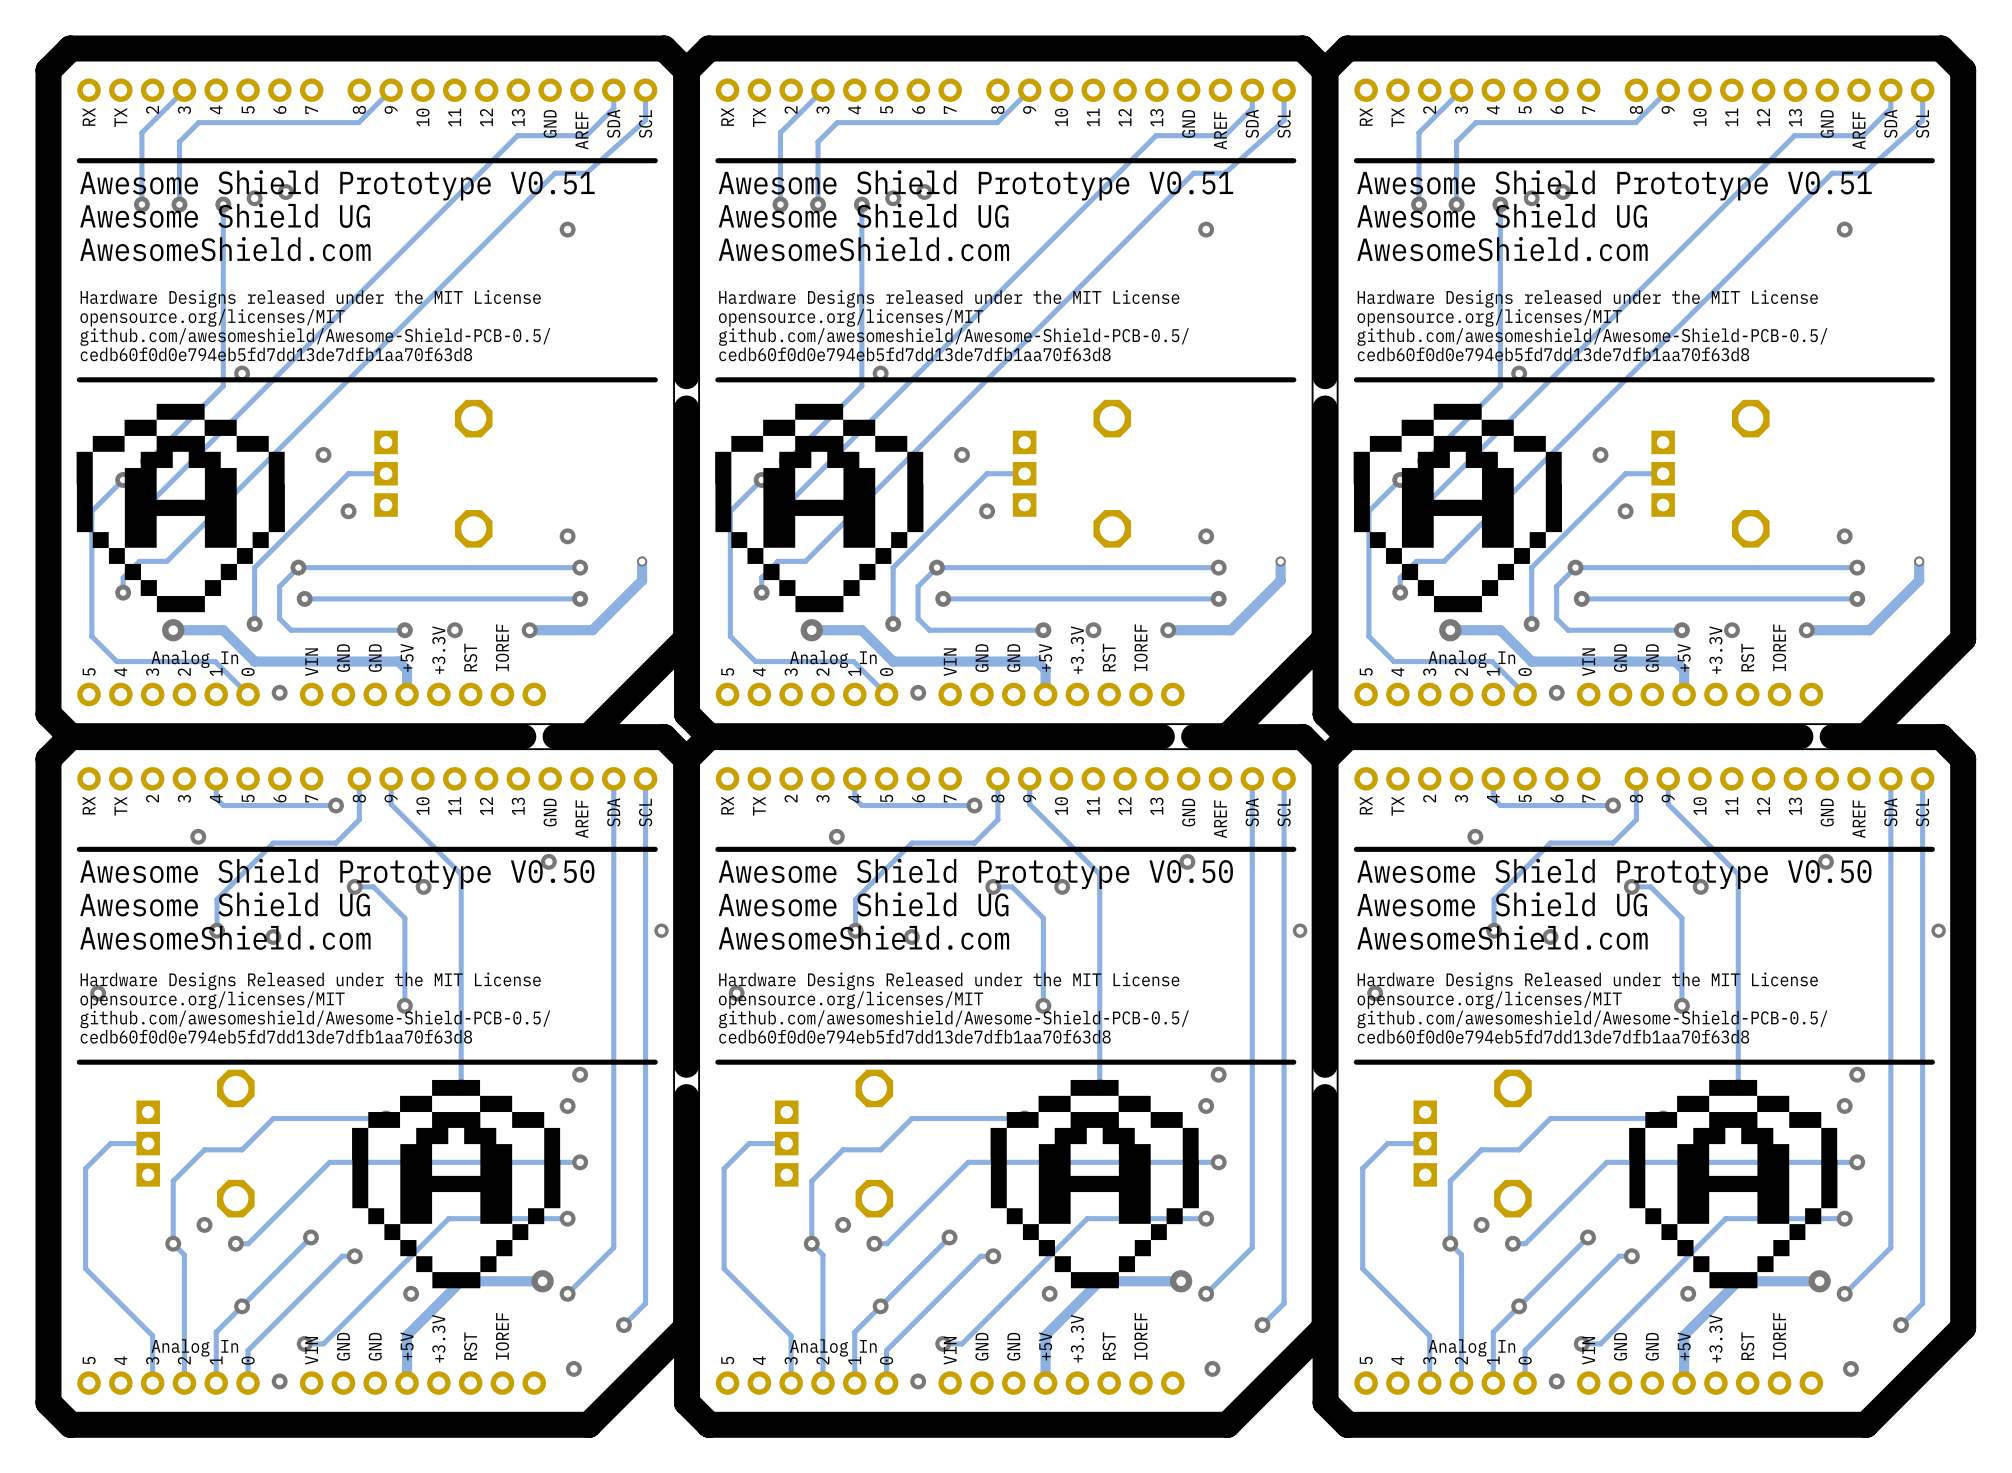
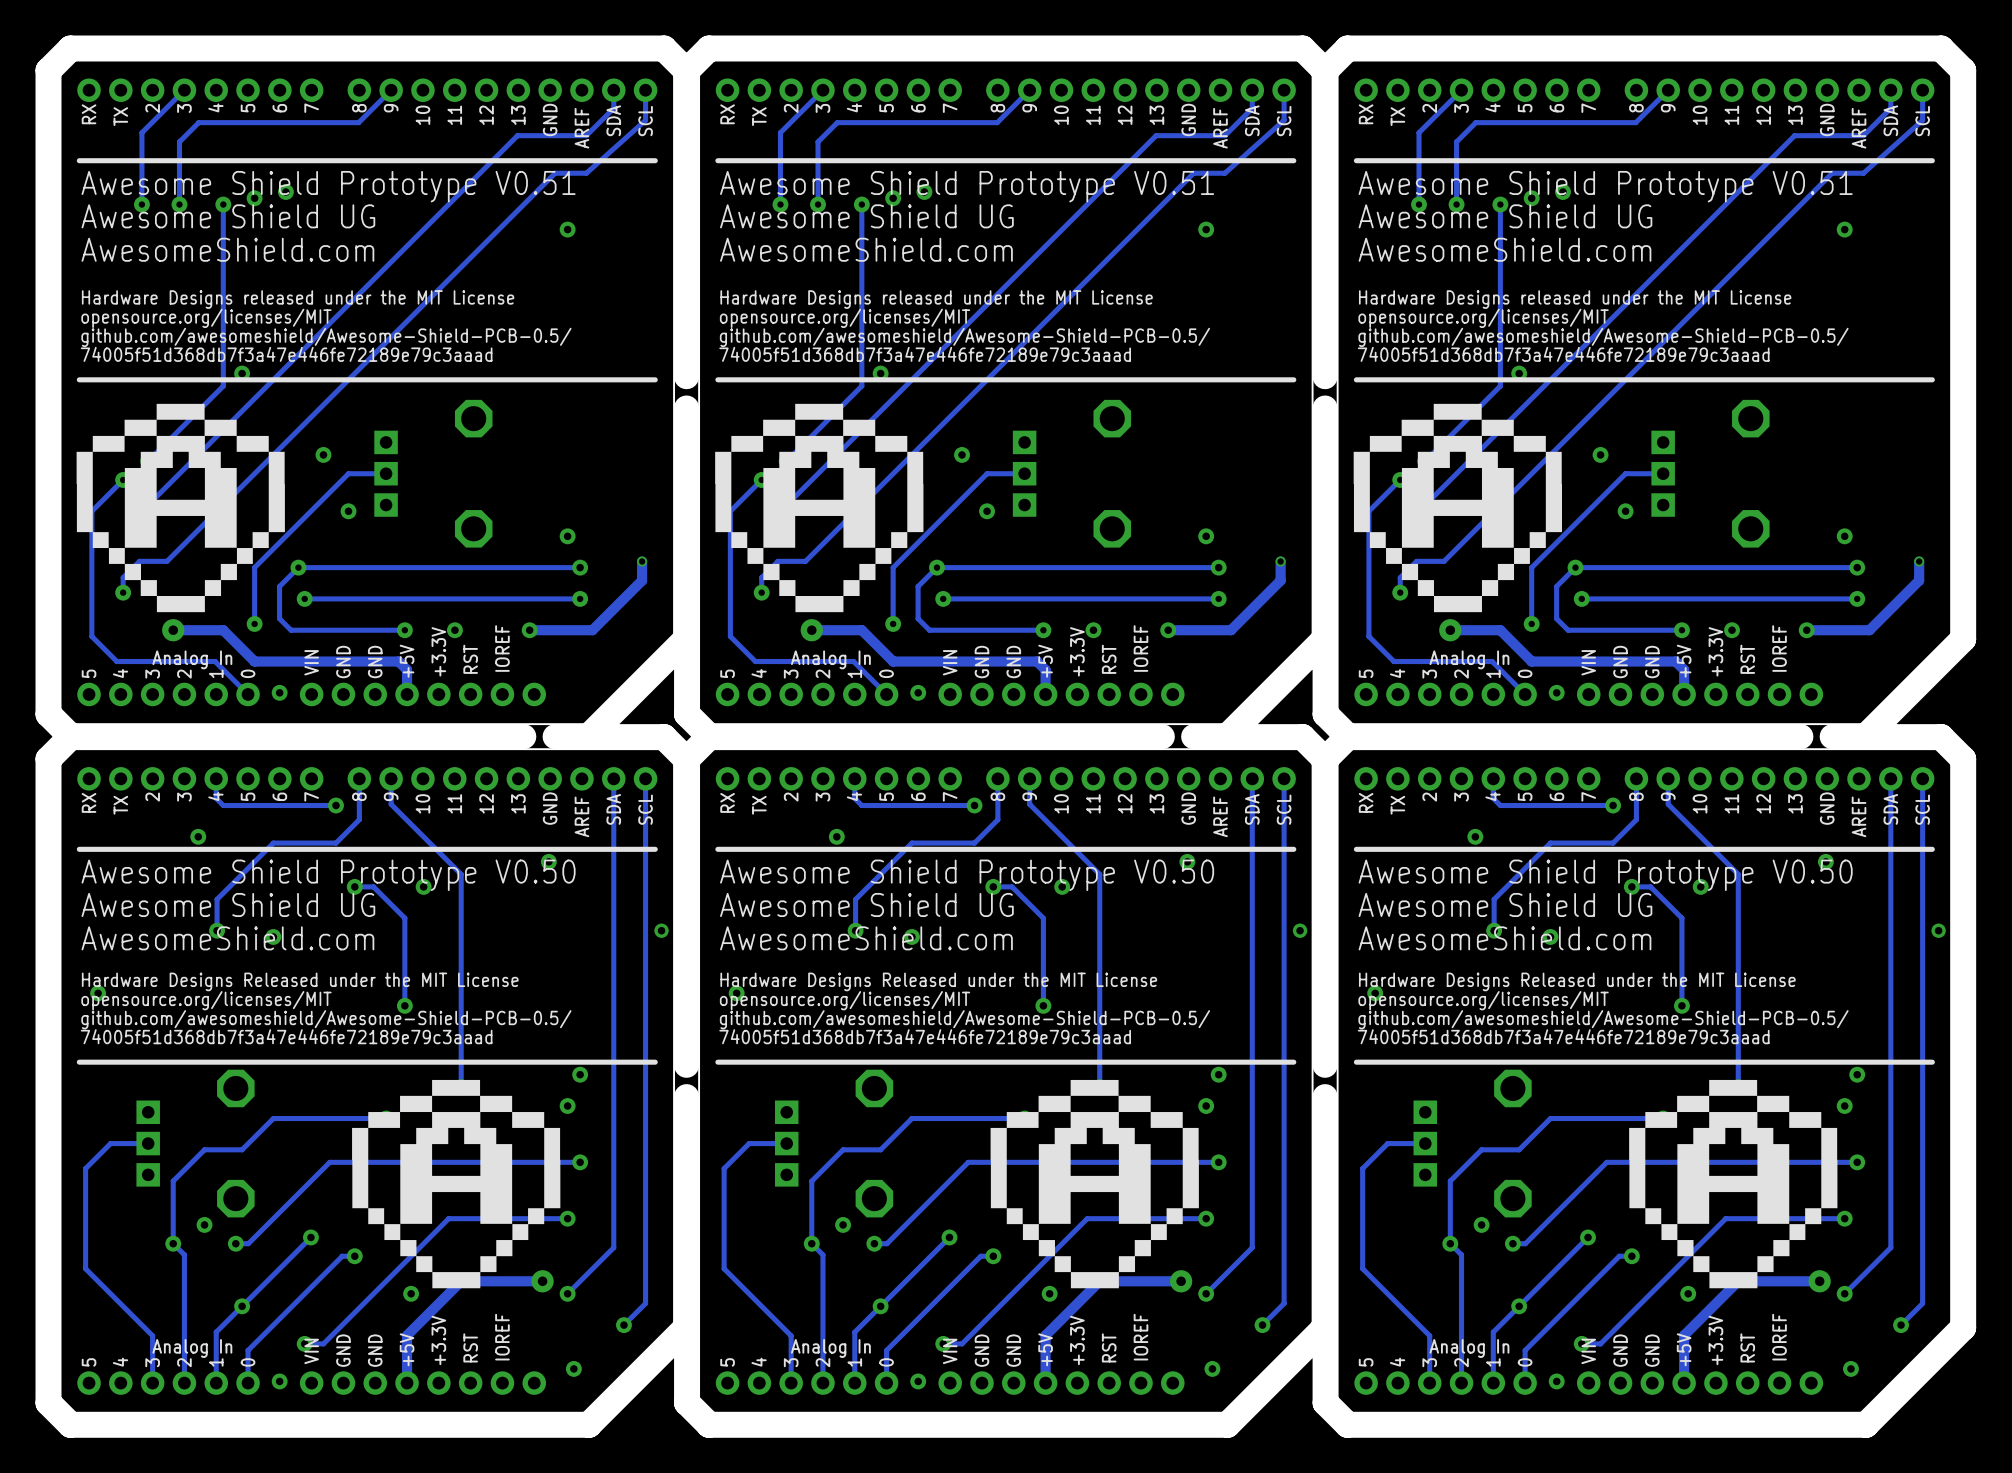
text: cedb60f0d0e794eb5fd7dd13de7dfb1aa70f63d8 (276, 354) -> 74005f51d368db7f3a47e446fe72189e79c3aaad (286, 354)
text: cedb60f0d0e794eb5fd7dd13de7dfb1aa70f63d8 (914, 354) -> 74005f51d368db7f3a47e446fe72189e79c3aaad (925, 354)
text: cedb60f0d0e794eb5fd7dd13de7dfb1aa70f63d8 (1553, 354) -> 74005f51d368db7f3a47e446fe72189e79c3aaad (1563, 354)
text: cedb60f0d0e794eb5fd7dd13de7dfb1aa70f63d8 (276, 1036) -> 74005f51d368db7f3a47e446fe72189e79c3aaad (286, 1036)
text: cedb60f0d0e794eb5fd7dd13de7dfb1aa70f63d8 (914, 1036) -> 74005f51d368db7f3a47e446fe72189e79c3aaad (925, 1036)
text: cedb60f0d0e794eb5fd7dd13de7dfb1aa70f63d8 (1553, 1036) -> 74005f51d368db7f3a47e446fe72189e79c3aaad (1563, 1036)

